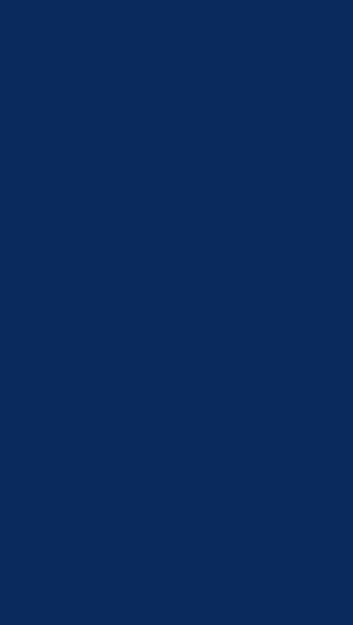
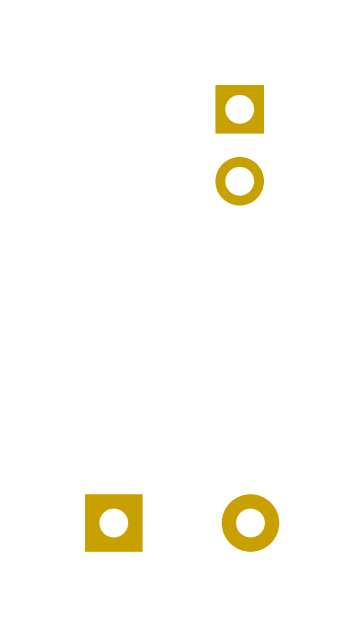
part: none -> (239, 145)
part: none -> (182, 523)

